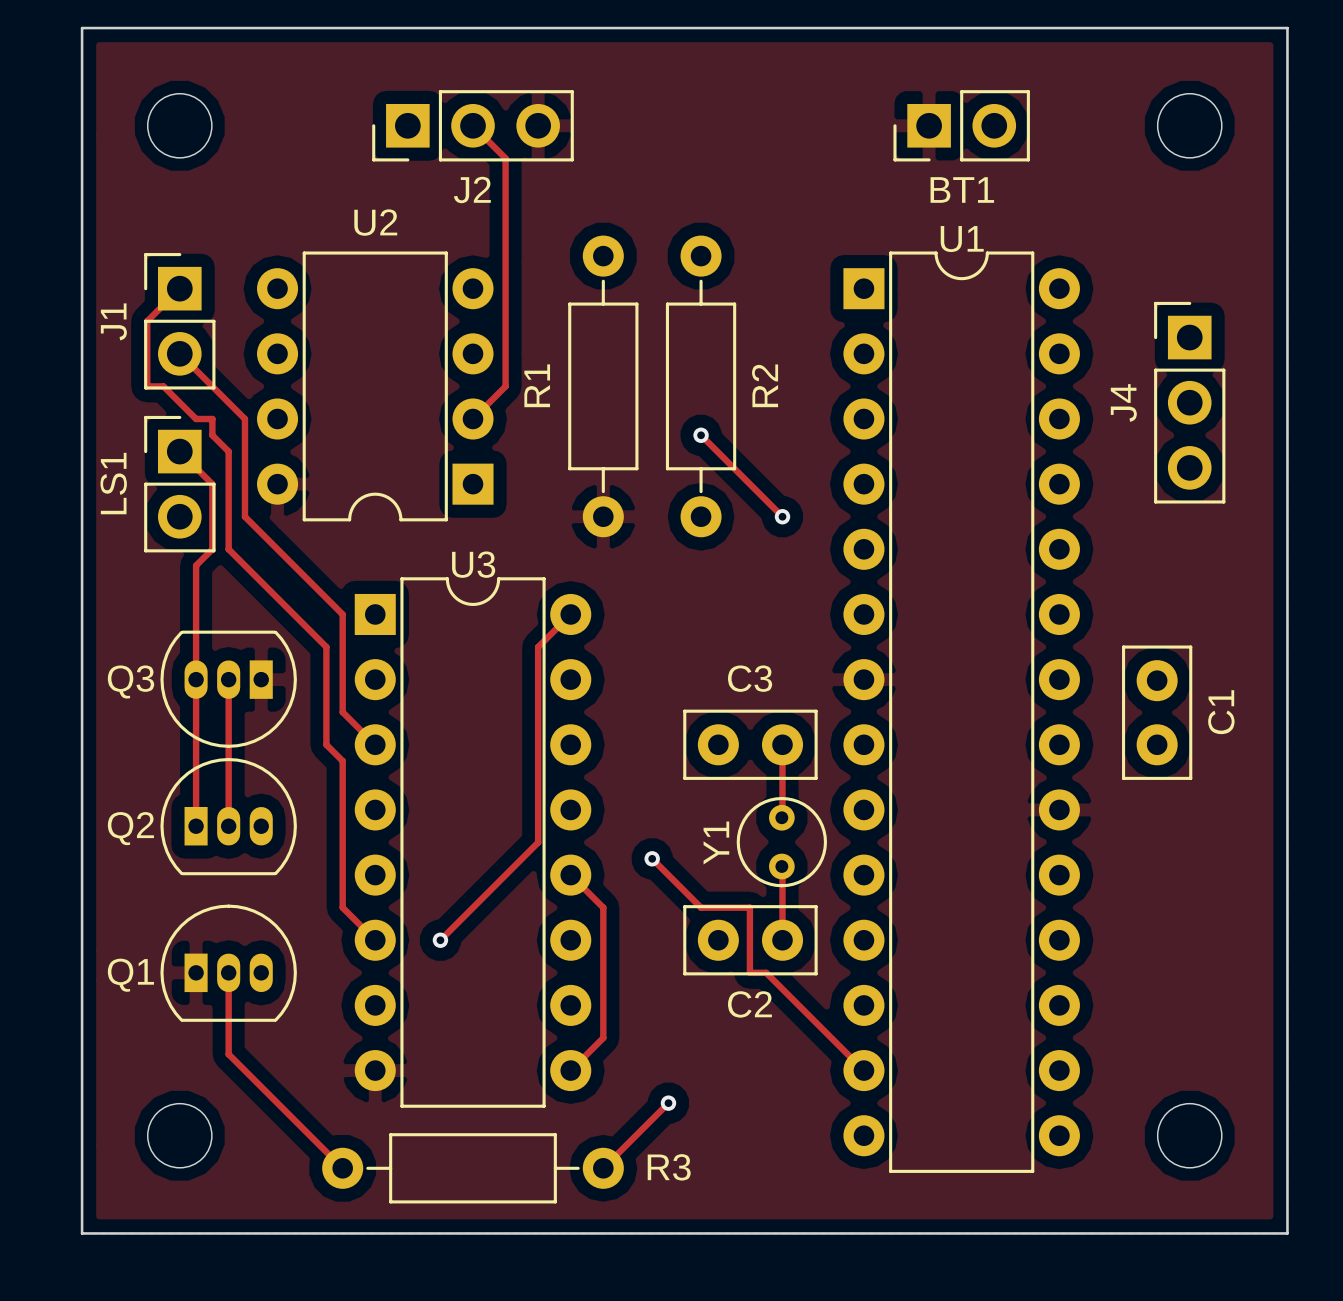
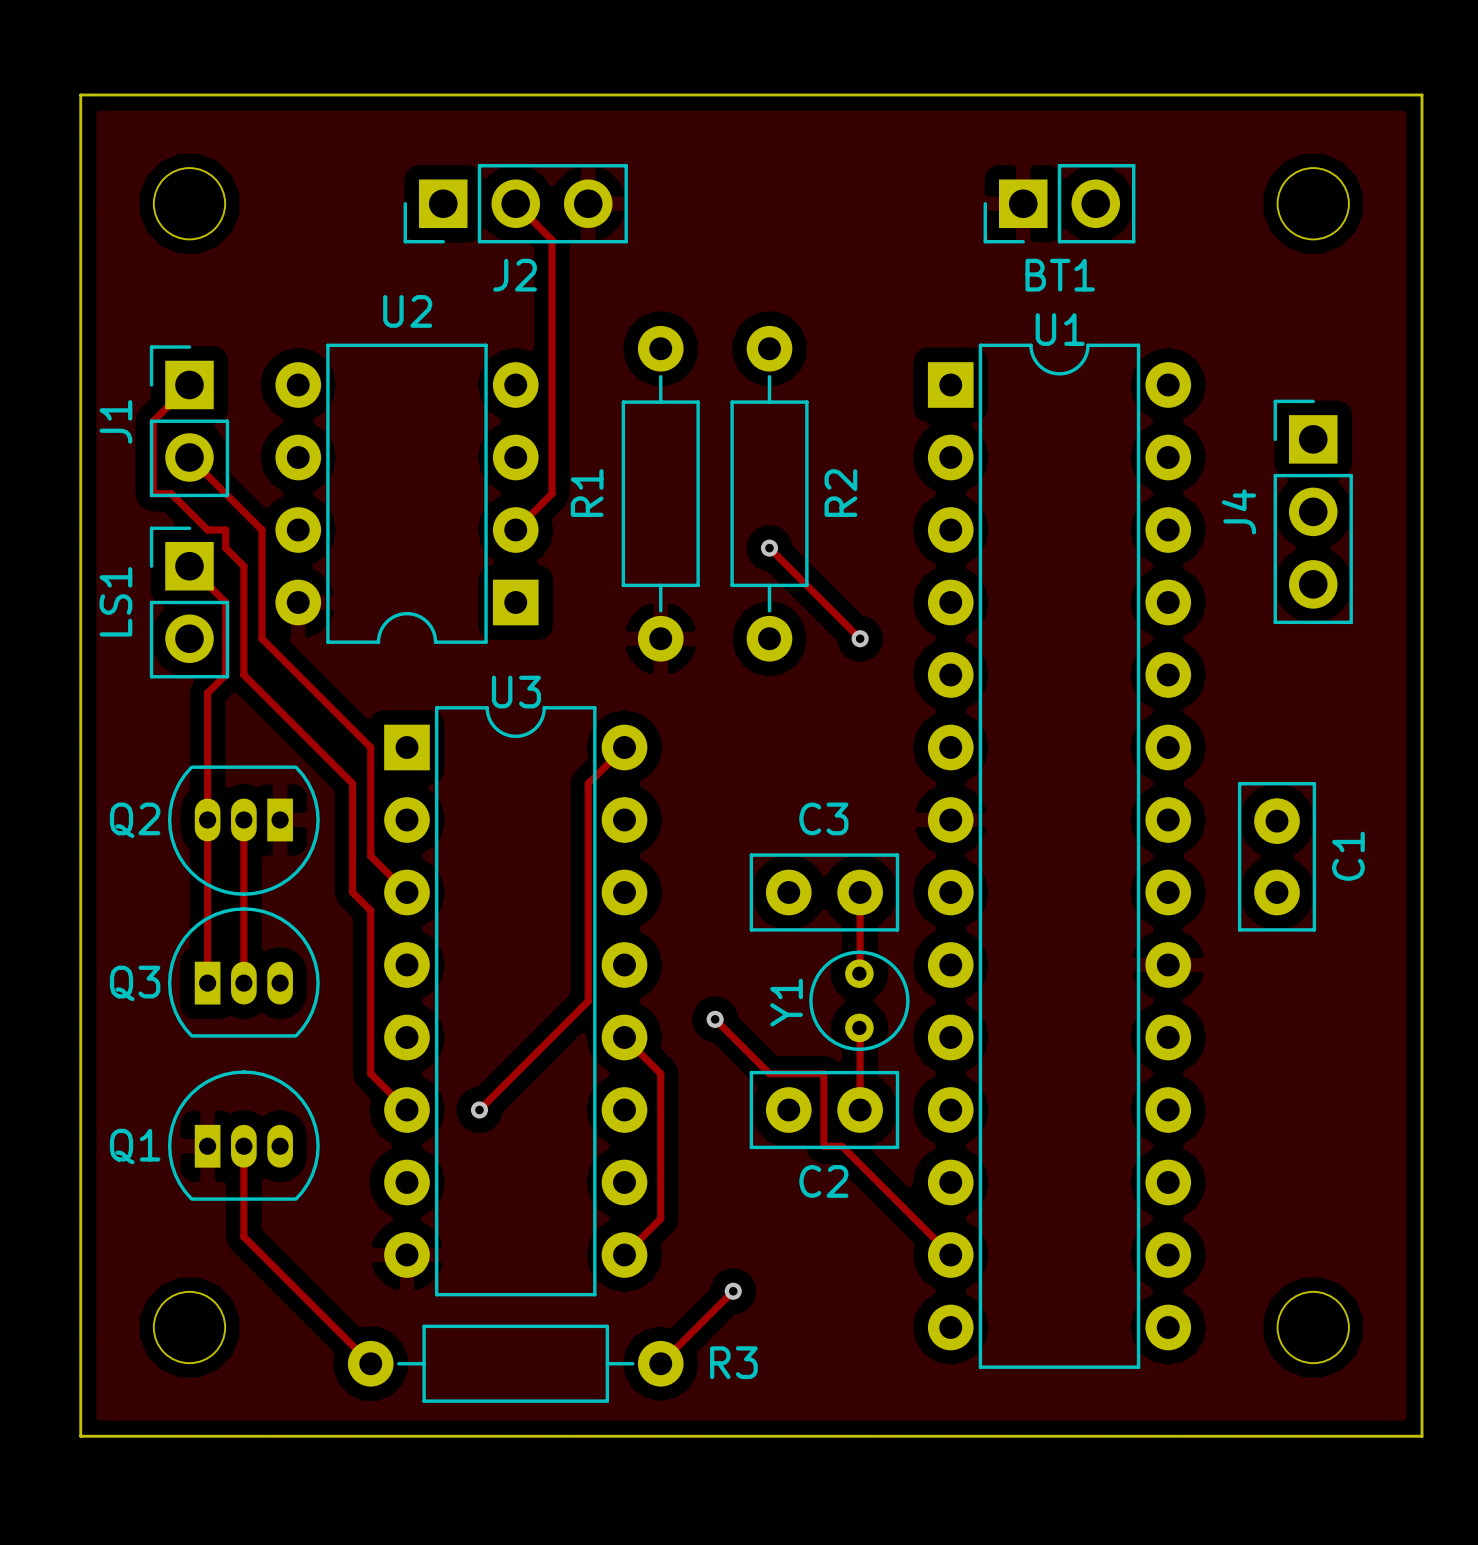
Q3 name position: Q3 (130, 682) -> Q3 (135, 983)
Q2 name position: Q2 (130, 828) -> Q2 (135, 820)

